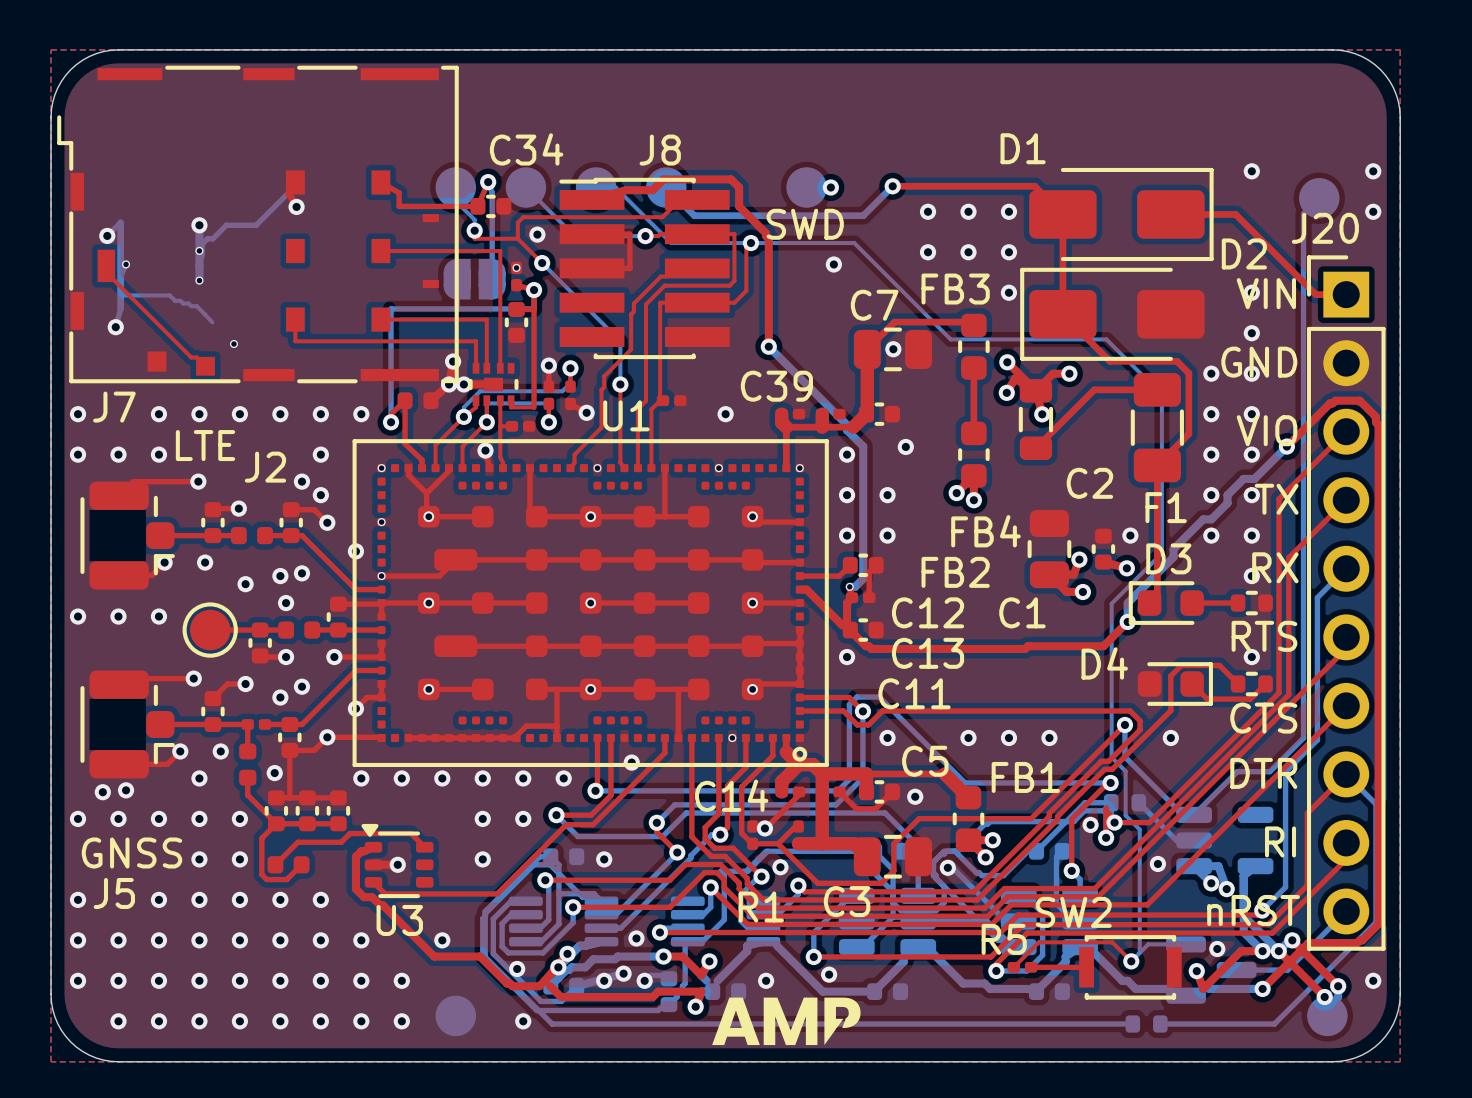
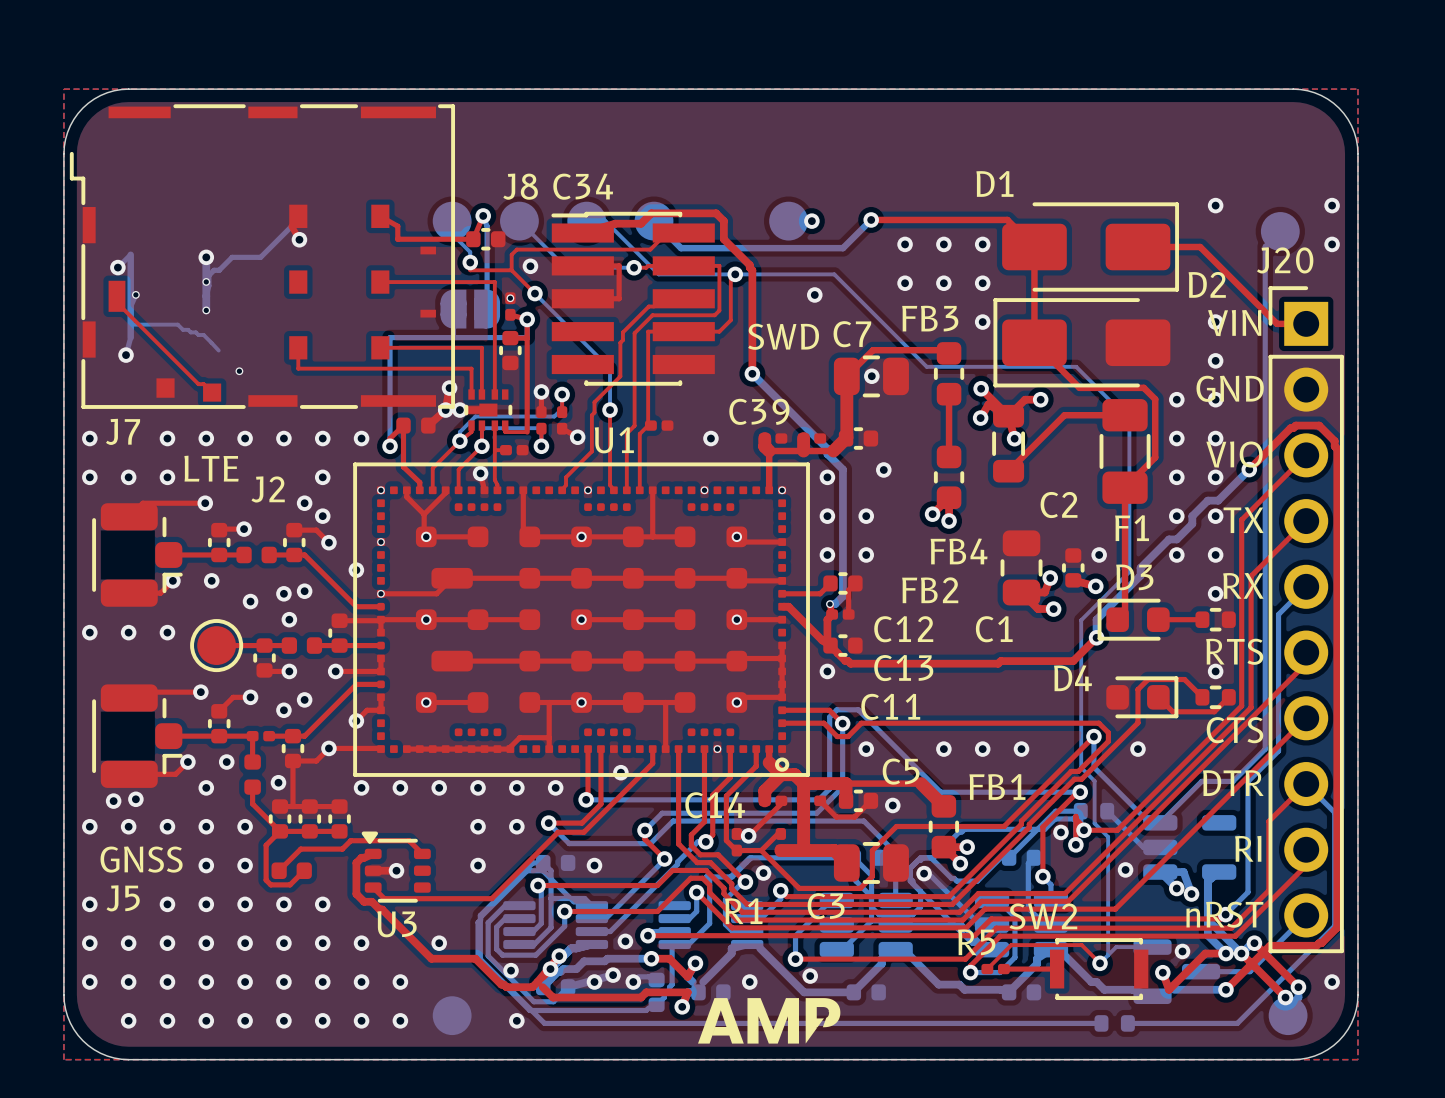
C34 name position: C34 (526, 149) -> C34 (583, 186)
J8 name position: J8 (660, 150) -> J8 (520, 186)
text position: SWD (805, 224) -> SWD (783, 336)

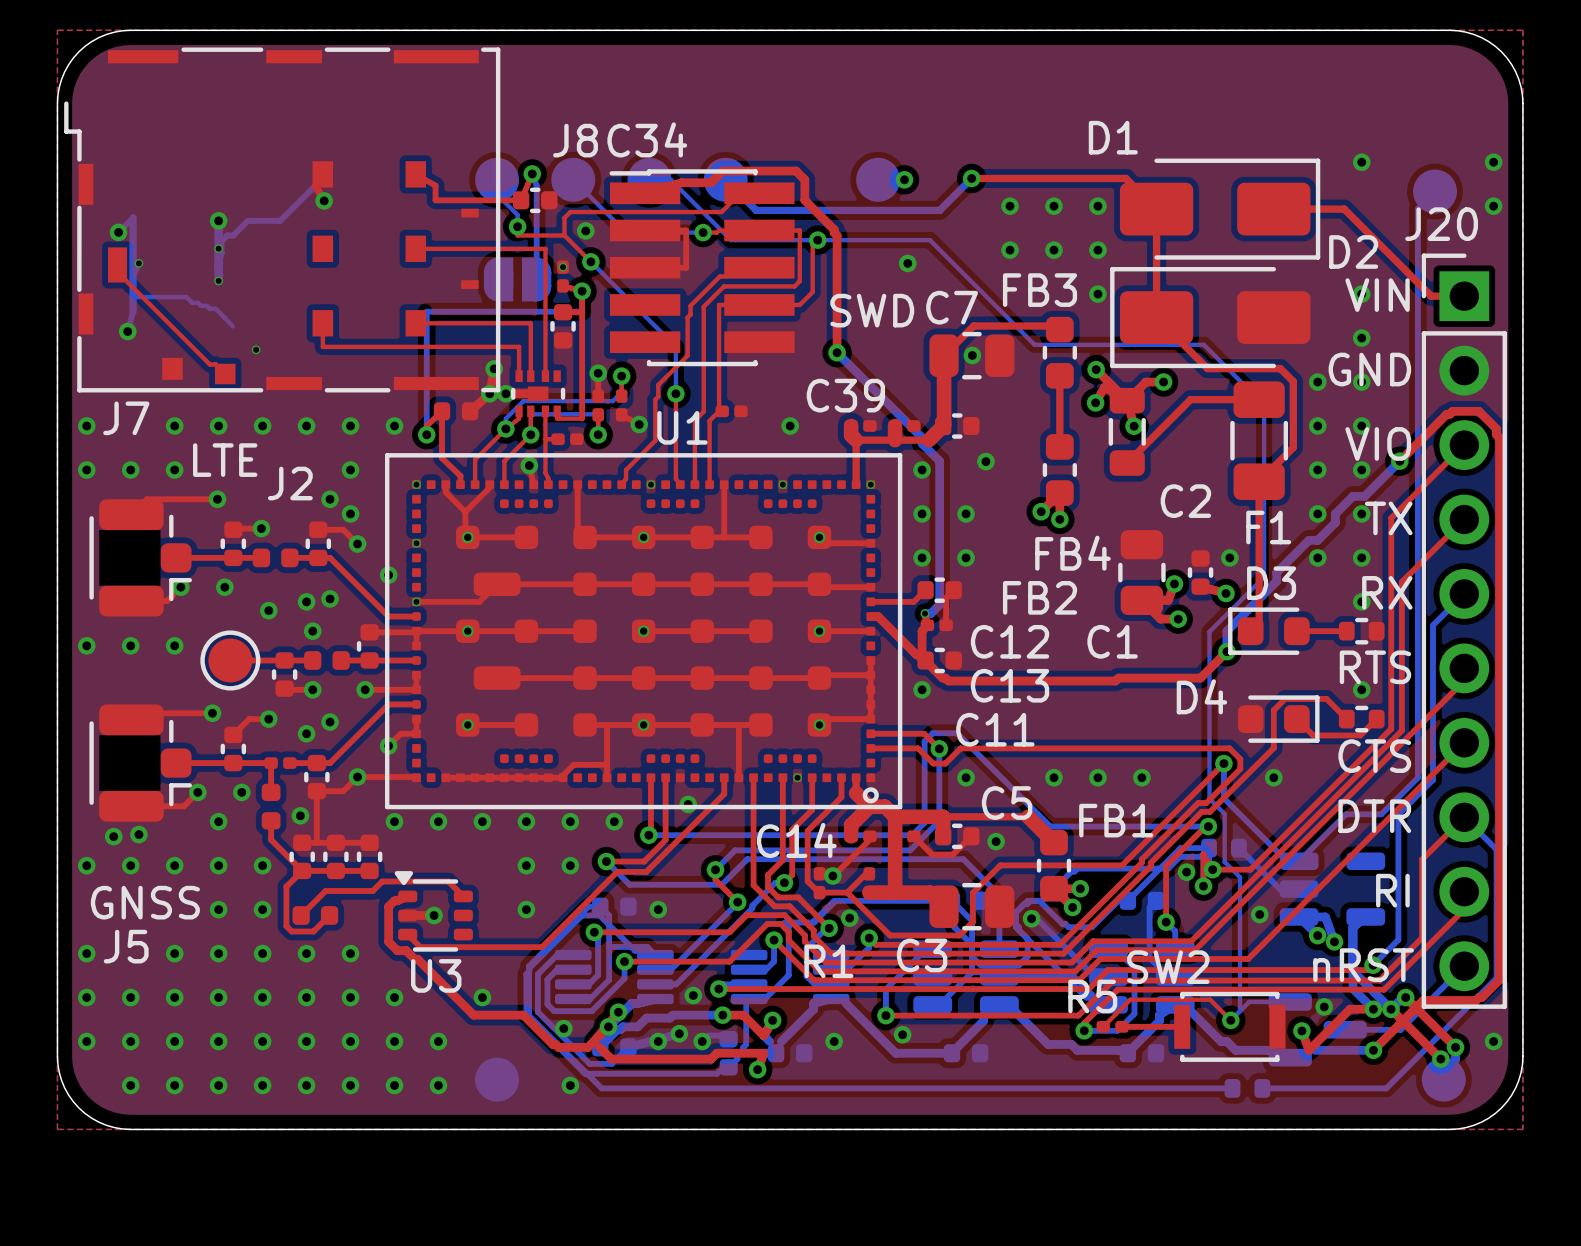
drawing: [698, 998, 841, 1044] -> none

